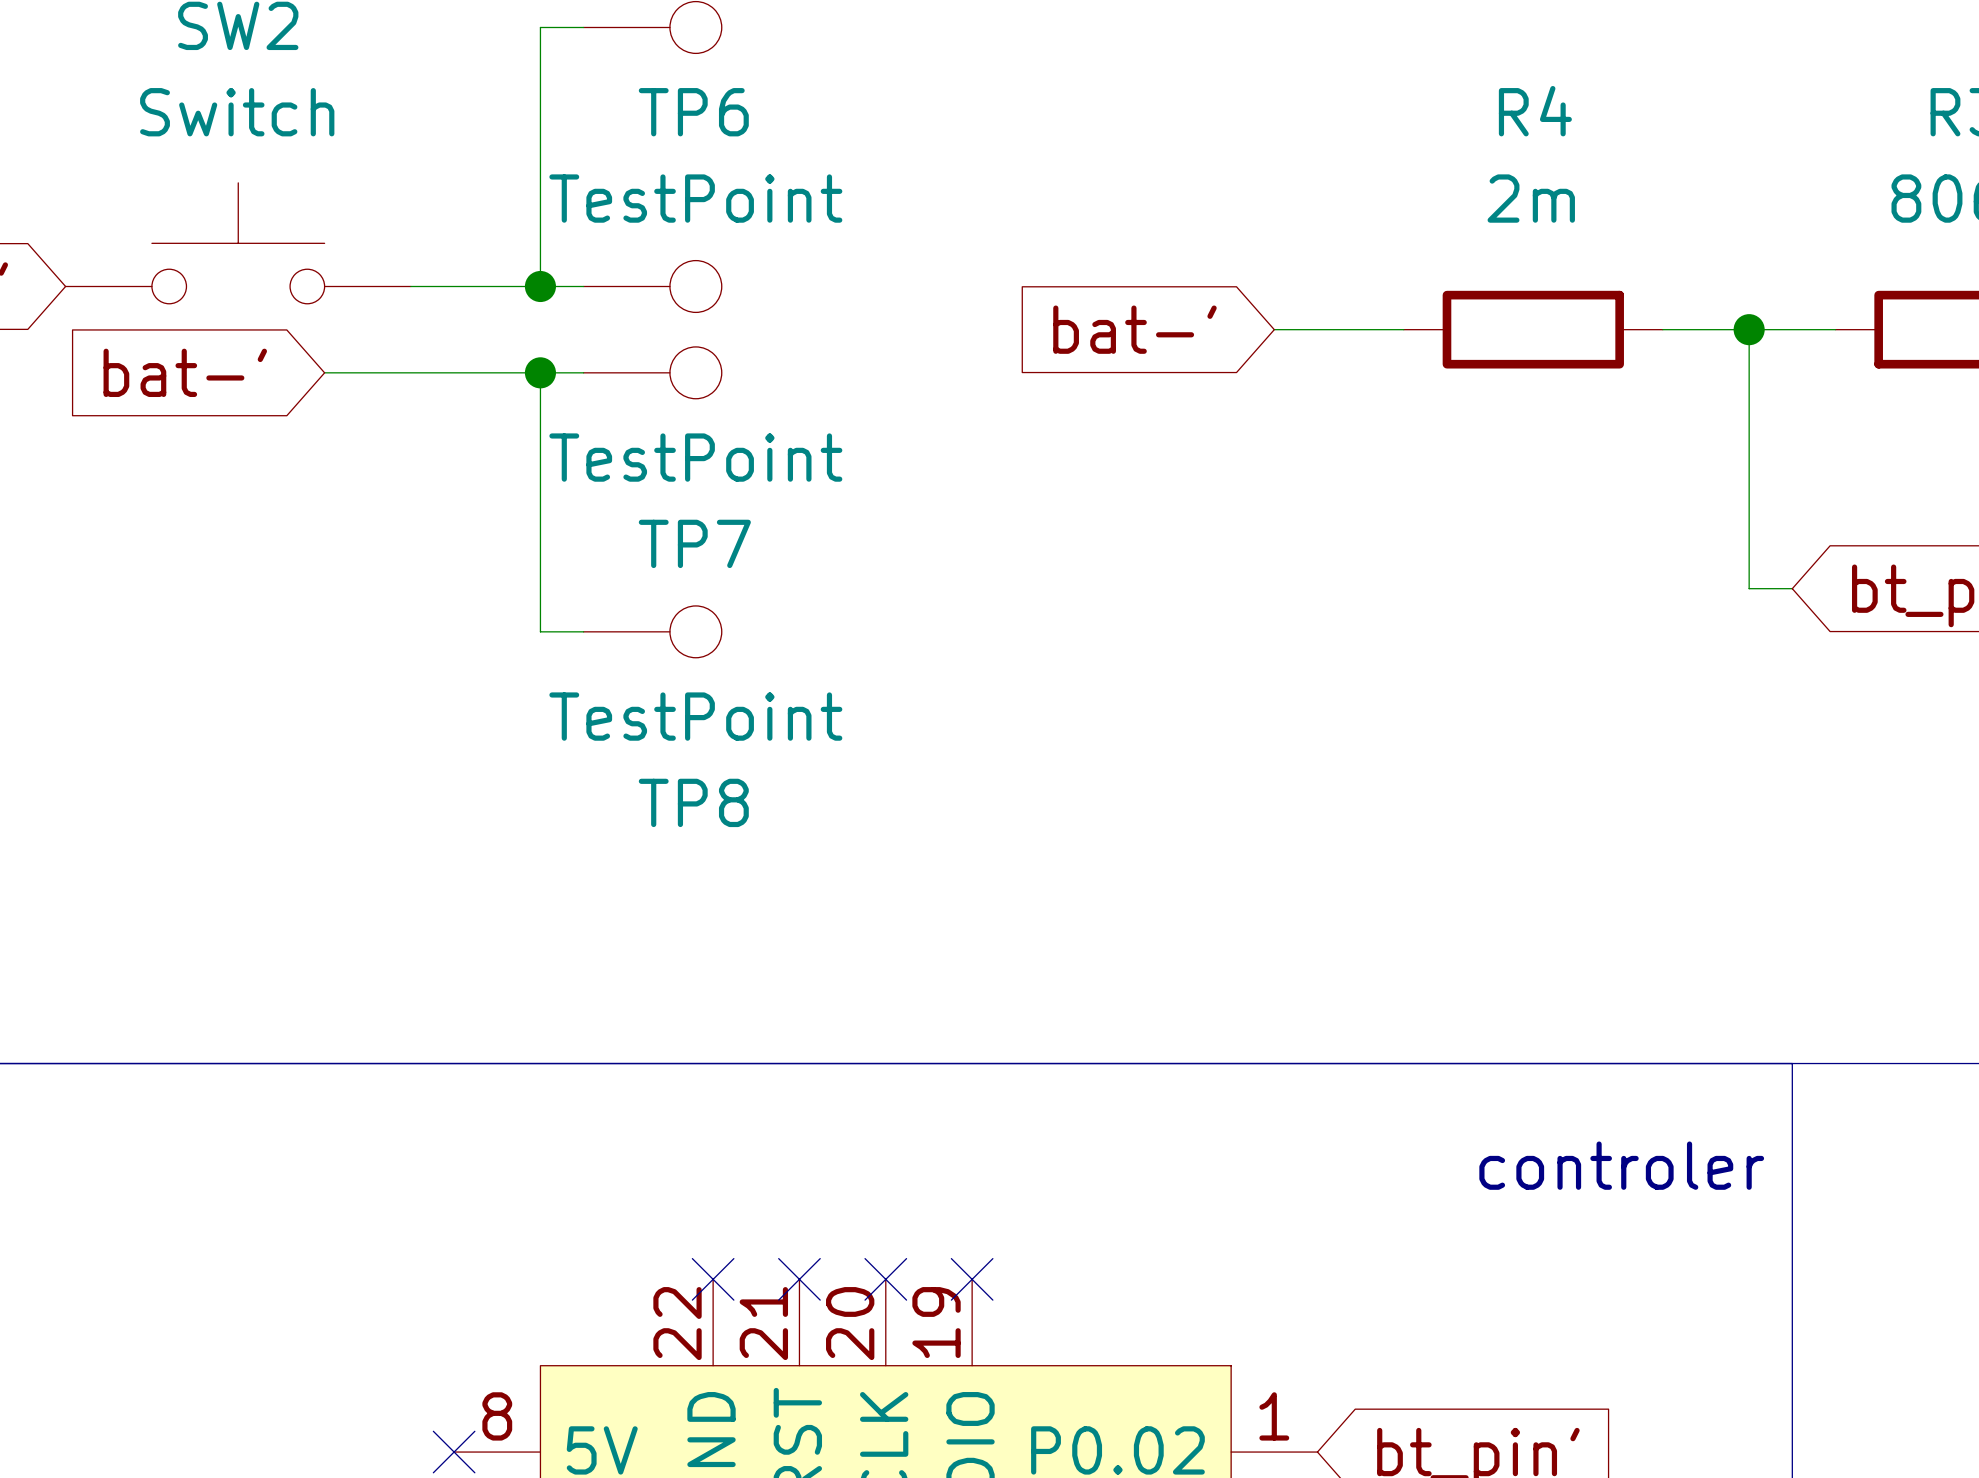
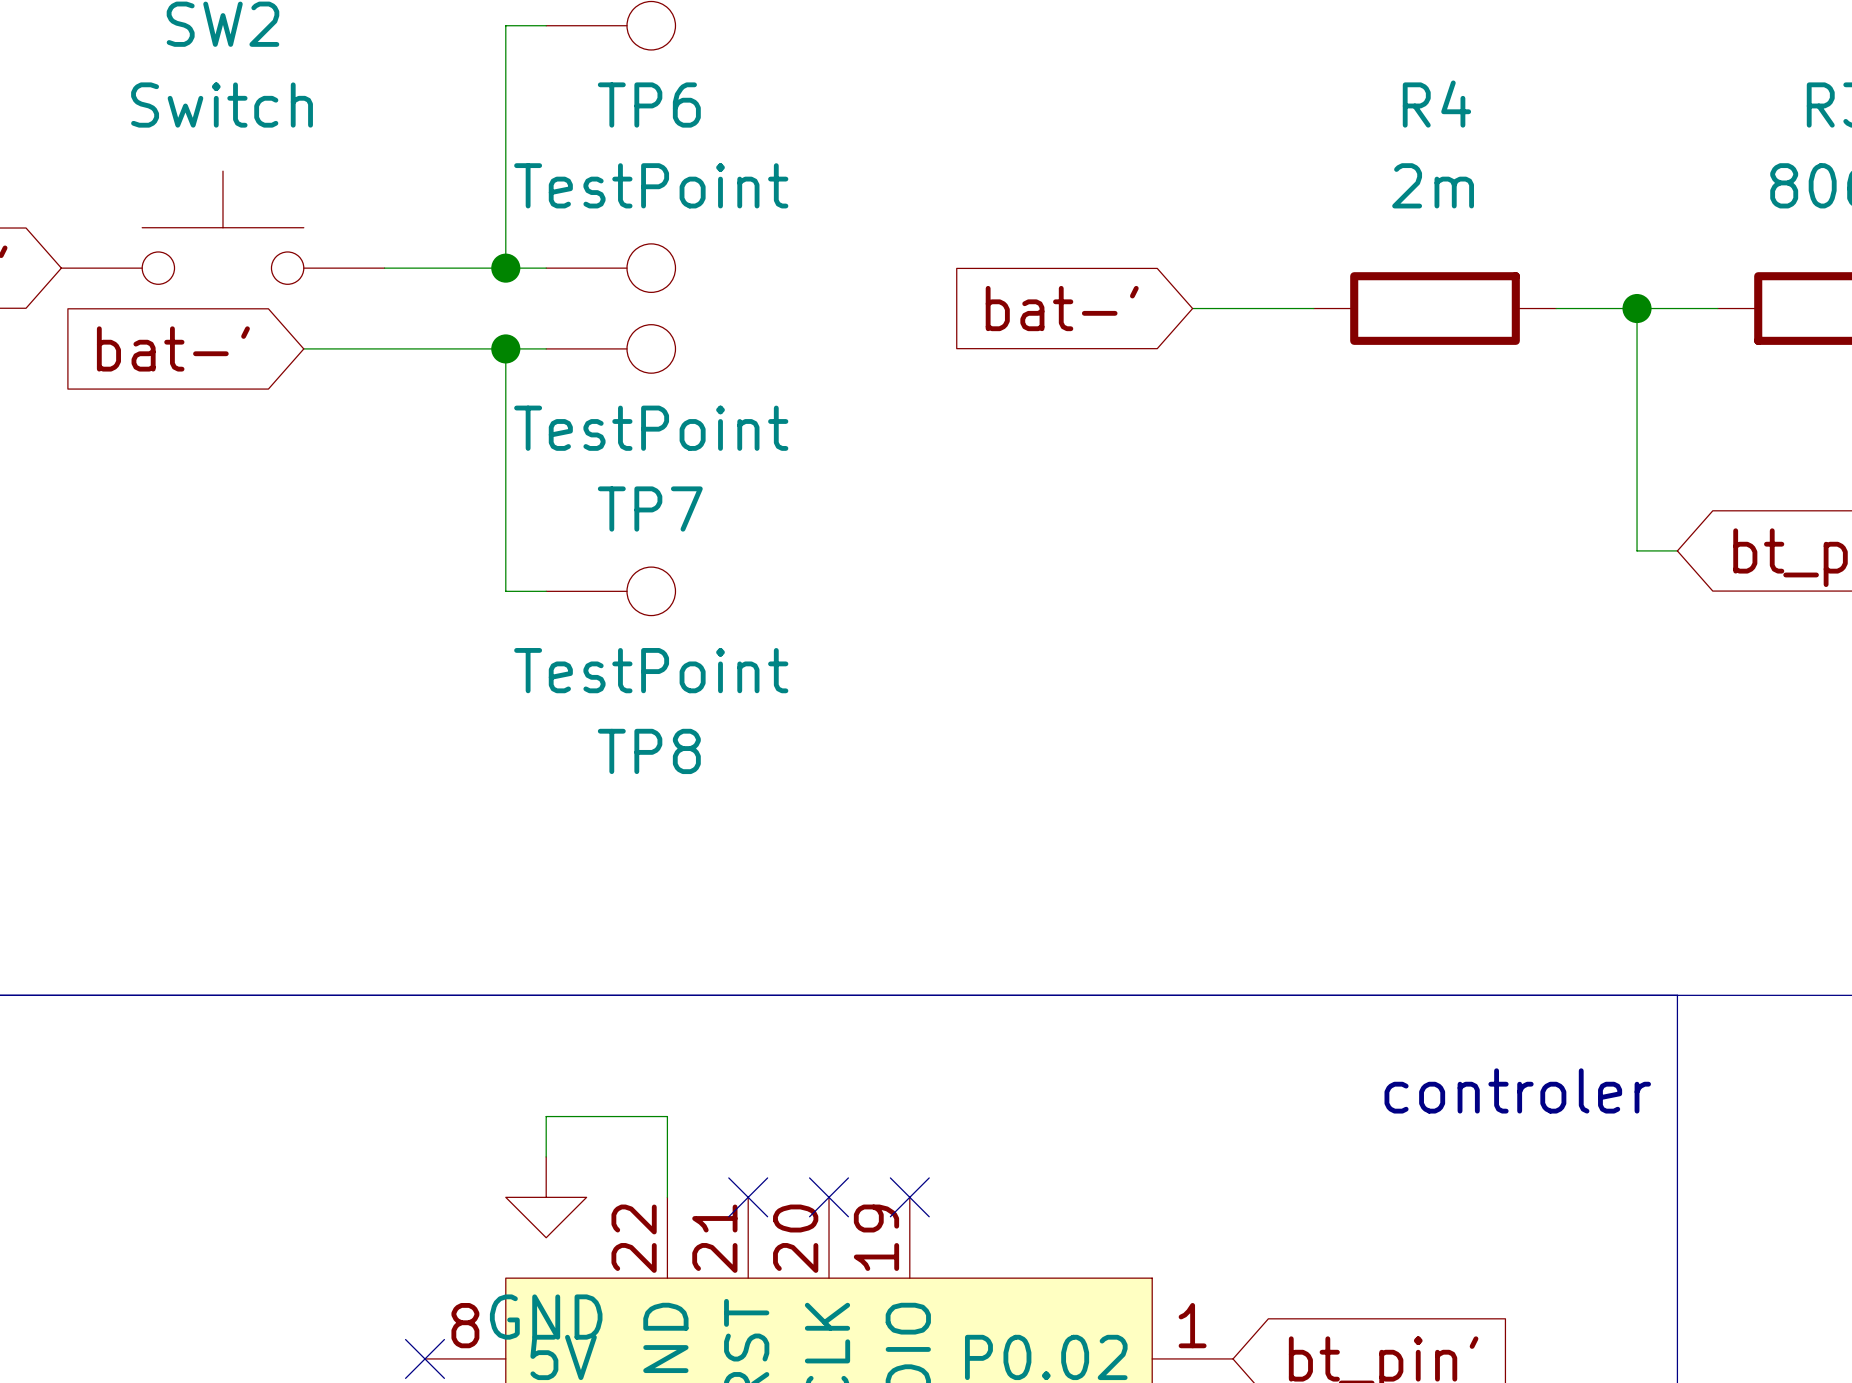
wire: none -> (546, 1156) (546, 1116) (667, 1116) (667, 1197)
power symbol: none -> GND (546, 1197)
no-connect mark: (713, 1279) -> none

